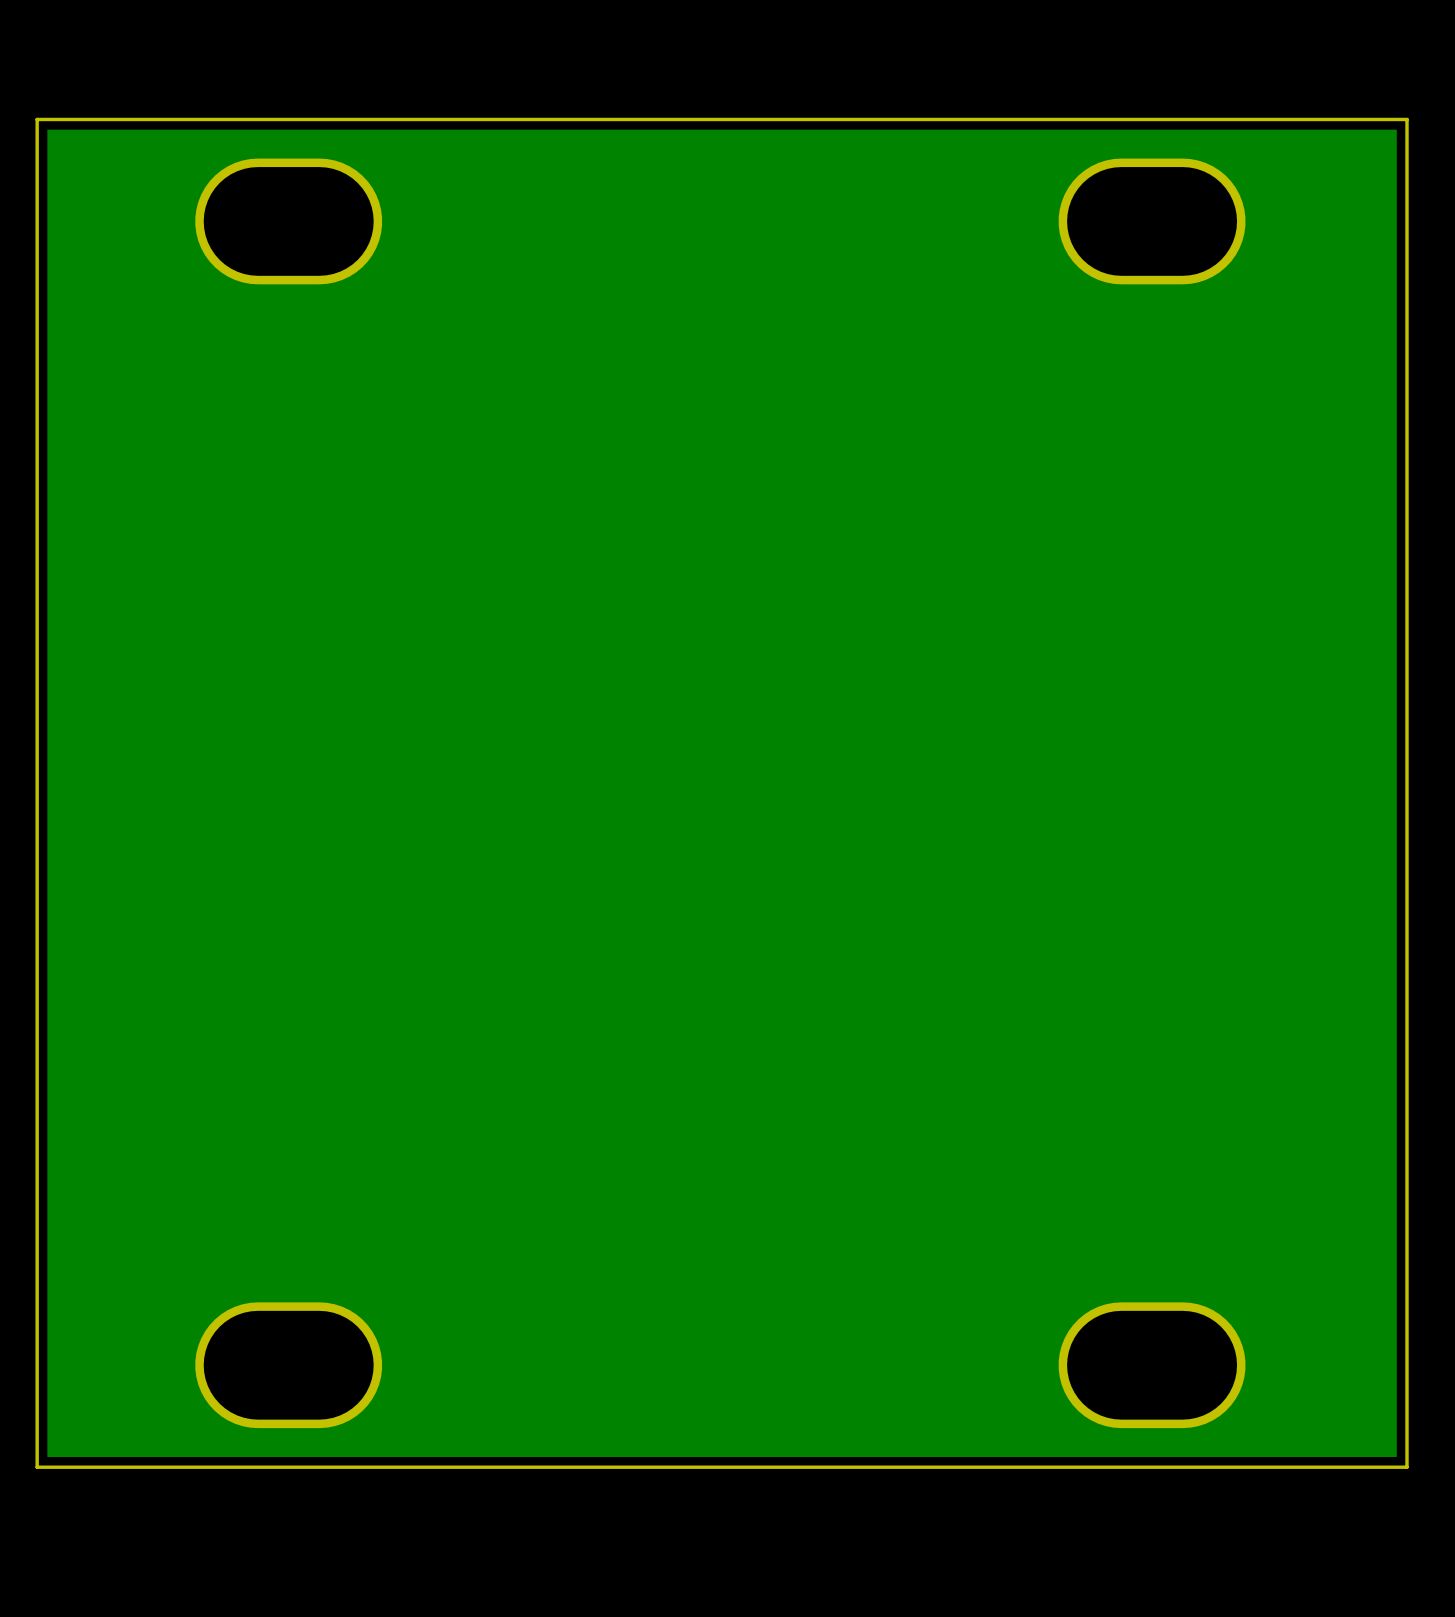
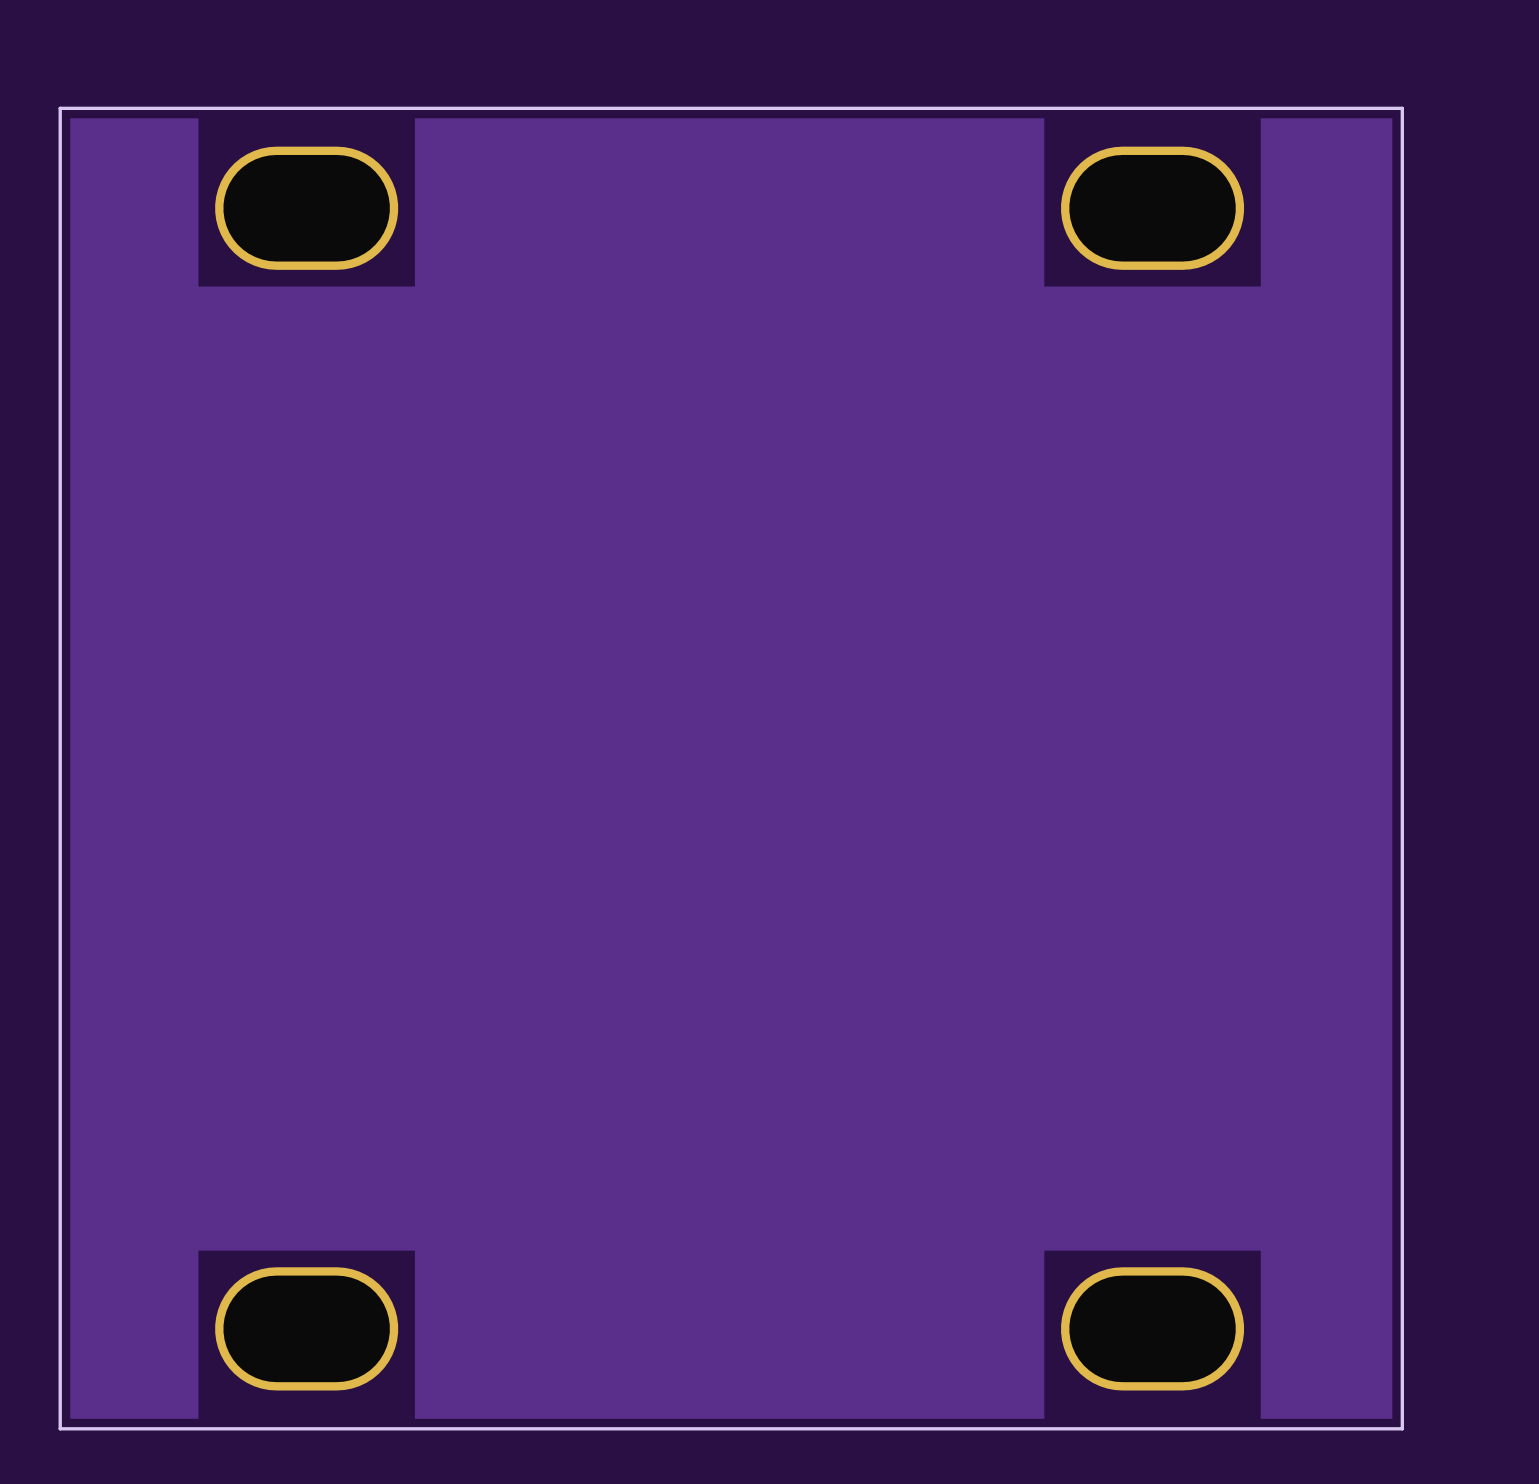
drawing shape: [47, 129, 1397, 1458] -> [198, 286, 1261, 1251]
drawing: none -> [70, 118, 199, 1419]
drawing: none -> [414, 118, 1045, 287]
drawing: none -> [1260, 118, 1393, 1419]
drawing: none -> [414, 1250, 1045, 1419]

